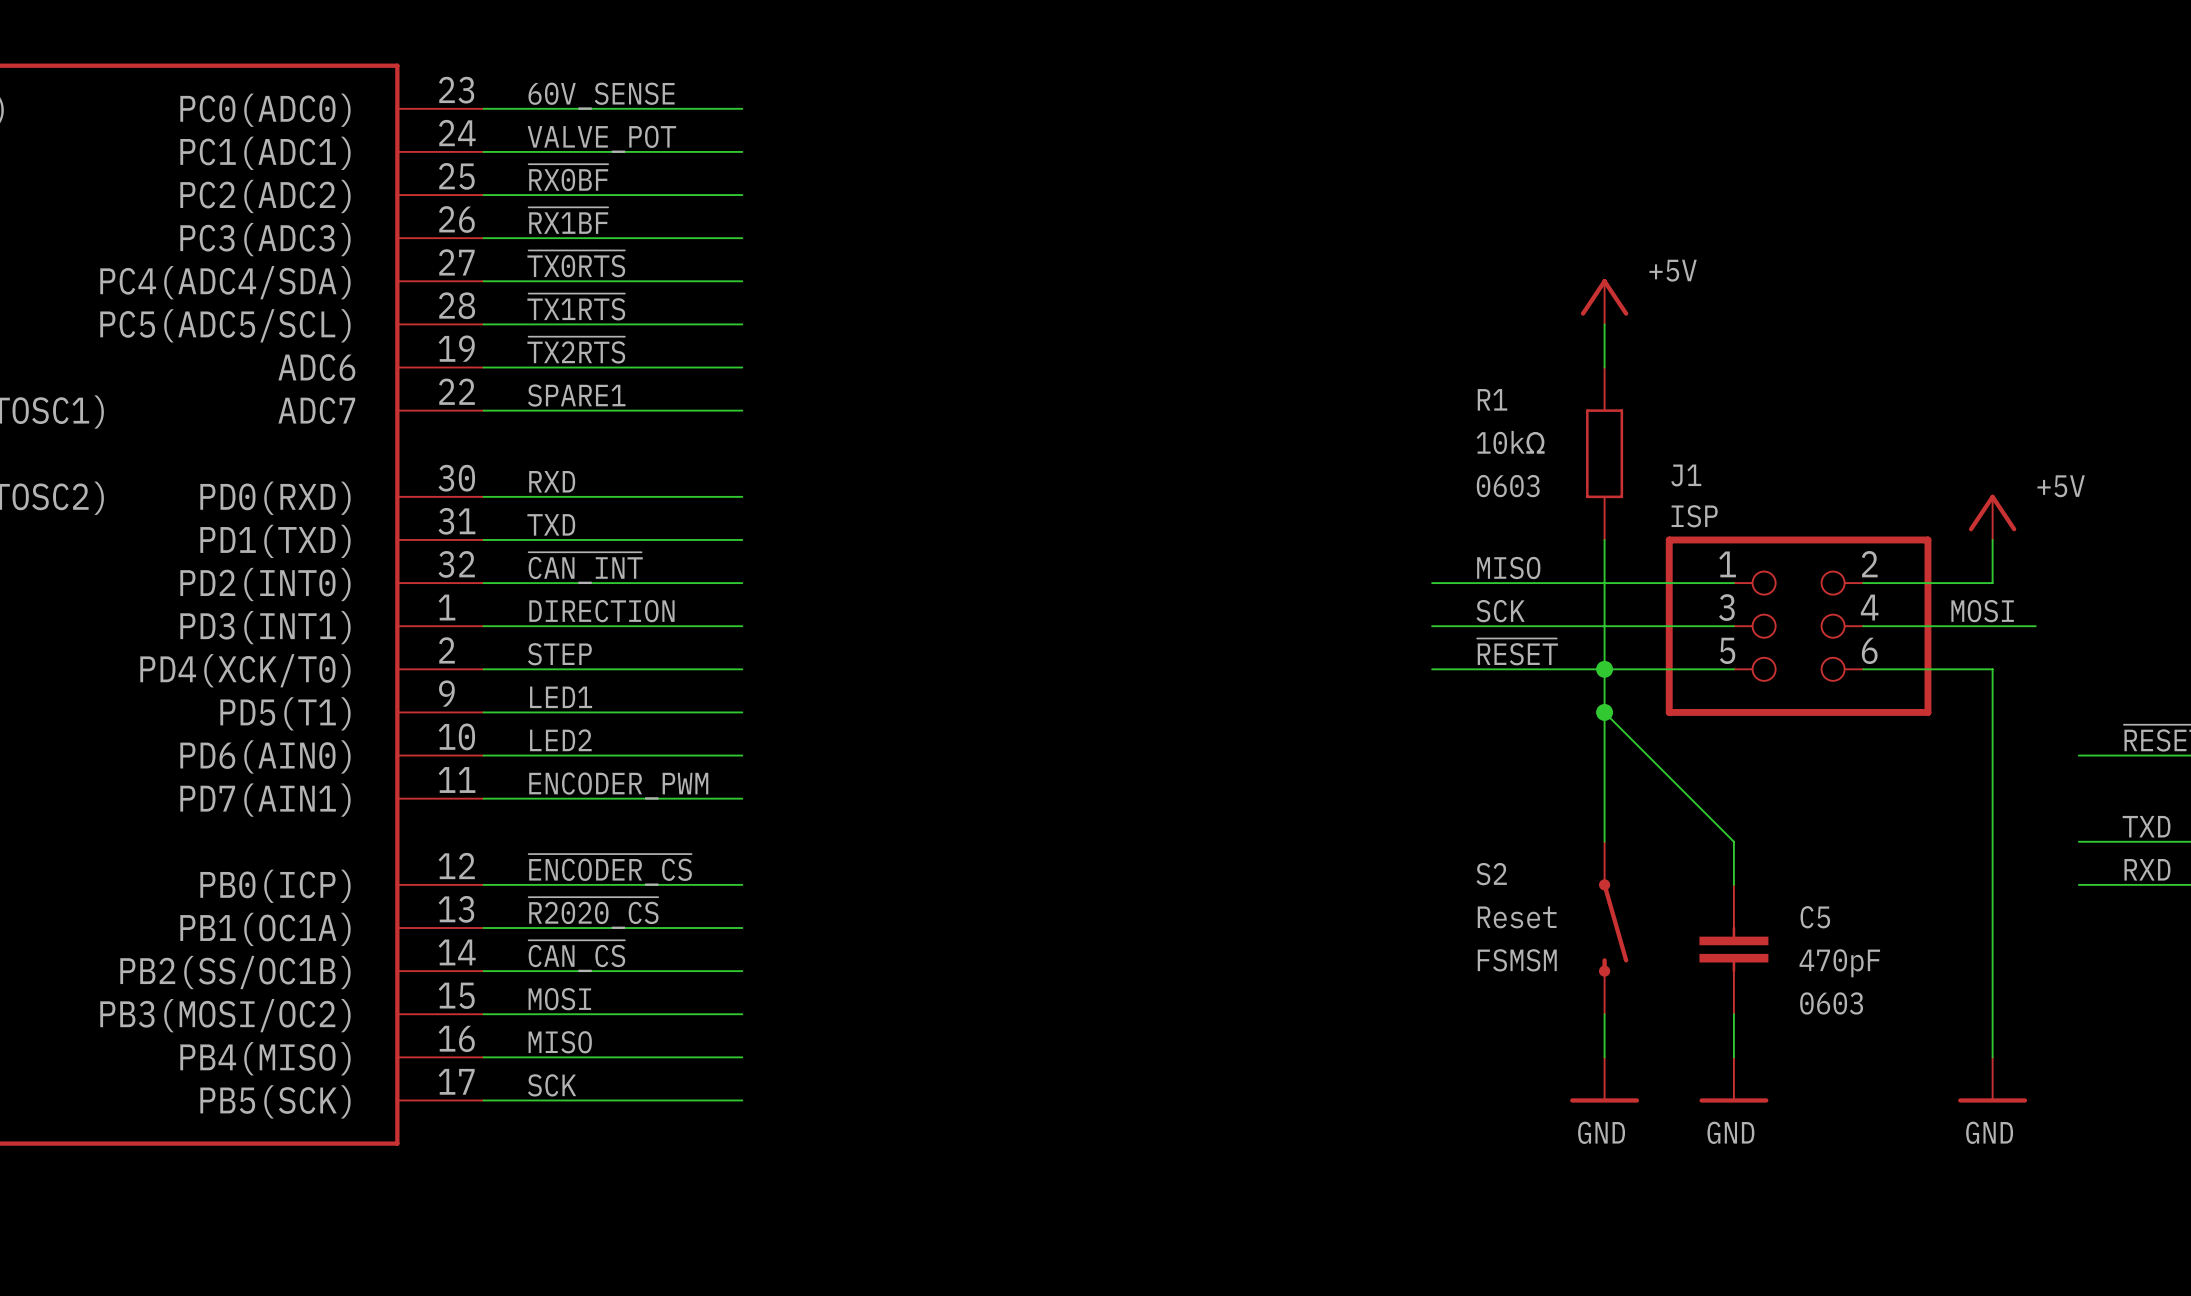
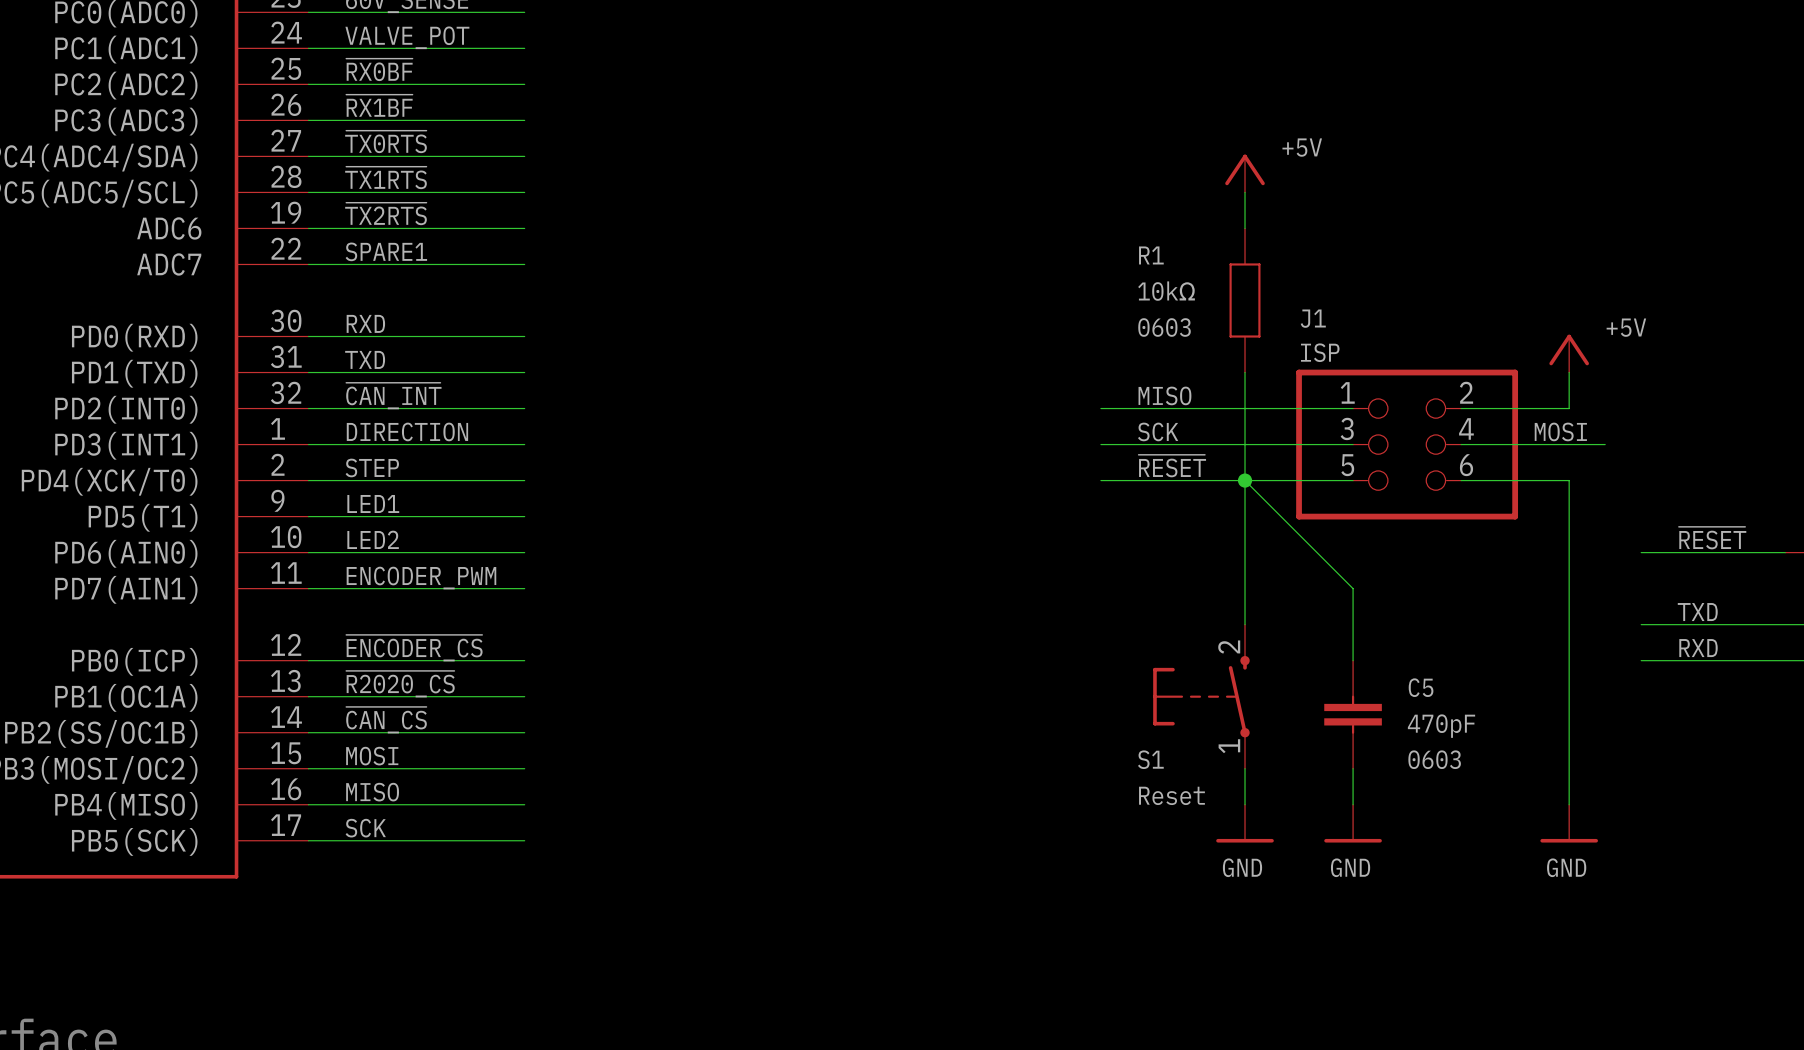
wire: (1604, 712) (1733, 841) -> (1245, 480) (1353, 588) (1353, 624)
junction: (1604, 712) -> none
S1: none -> Reset (1201, 696)
S2: Reset (1613, 928) -> none

